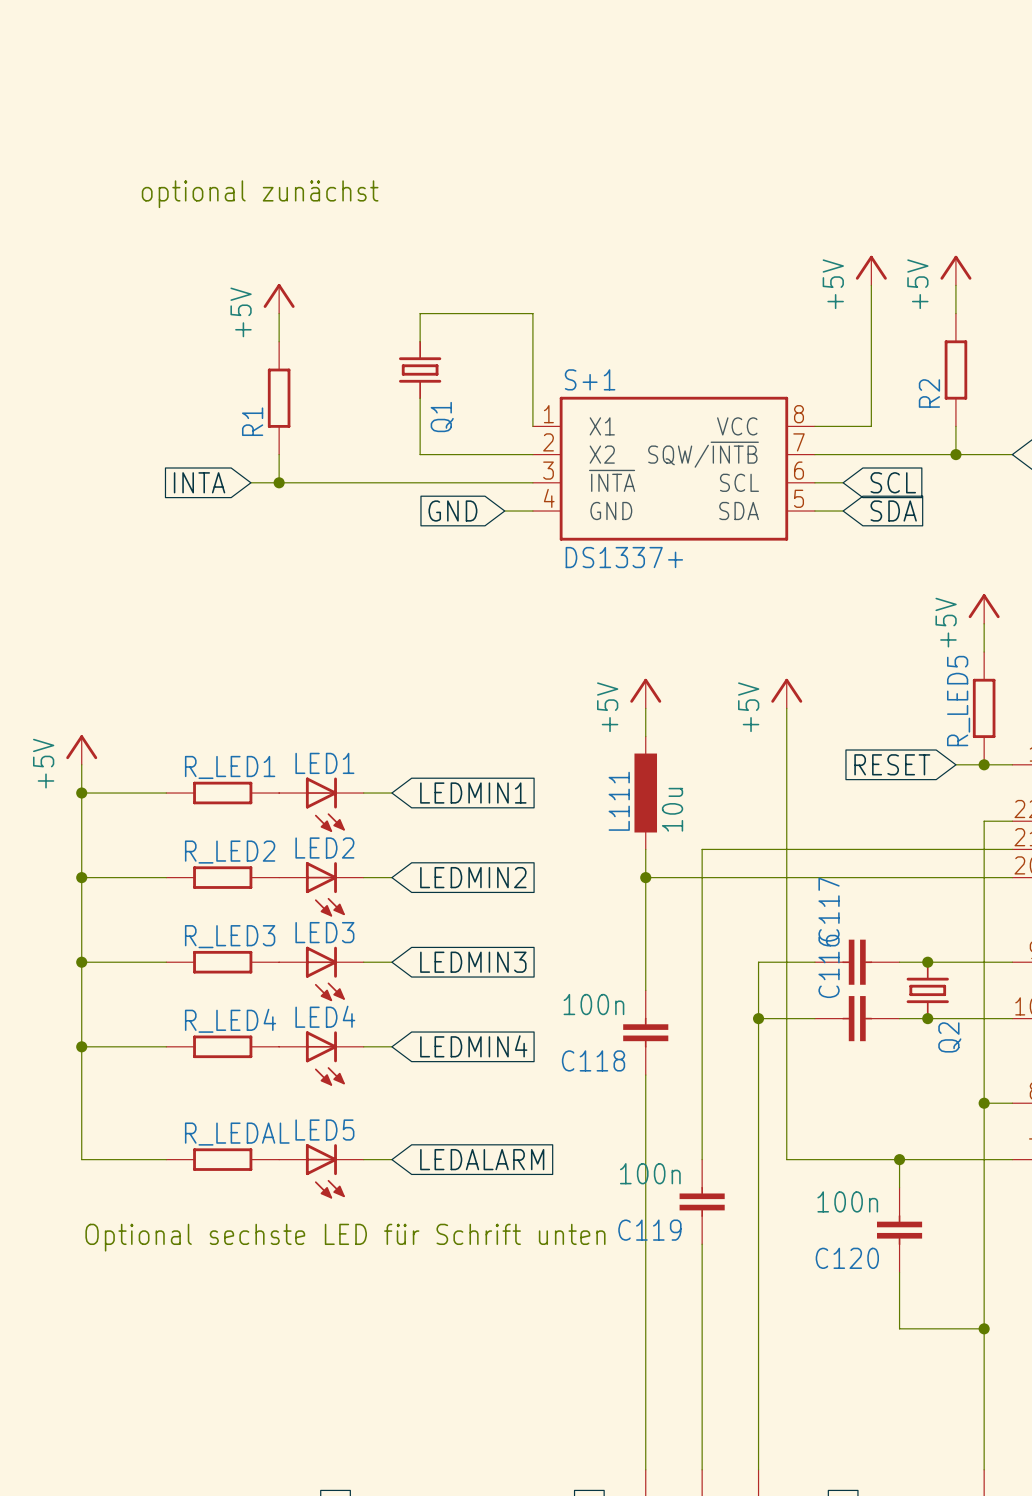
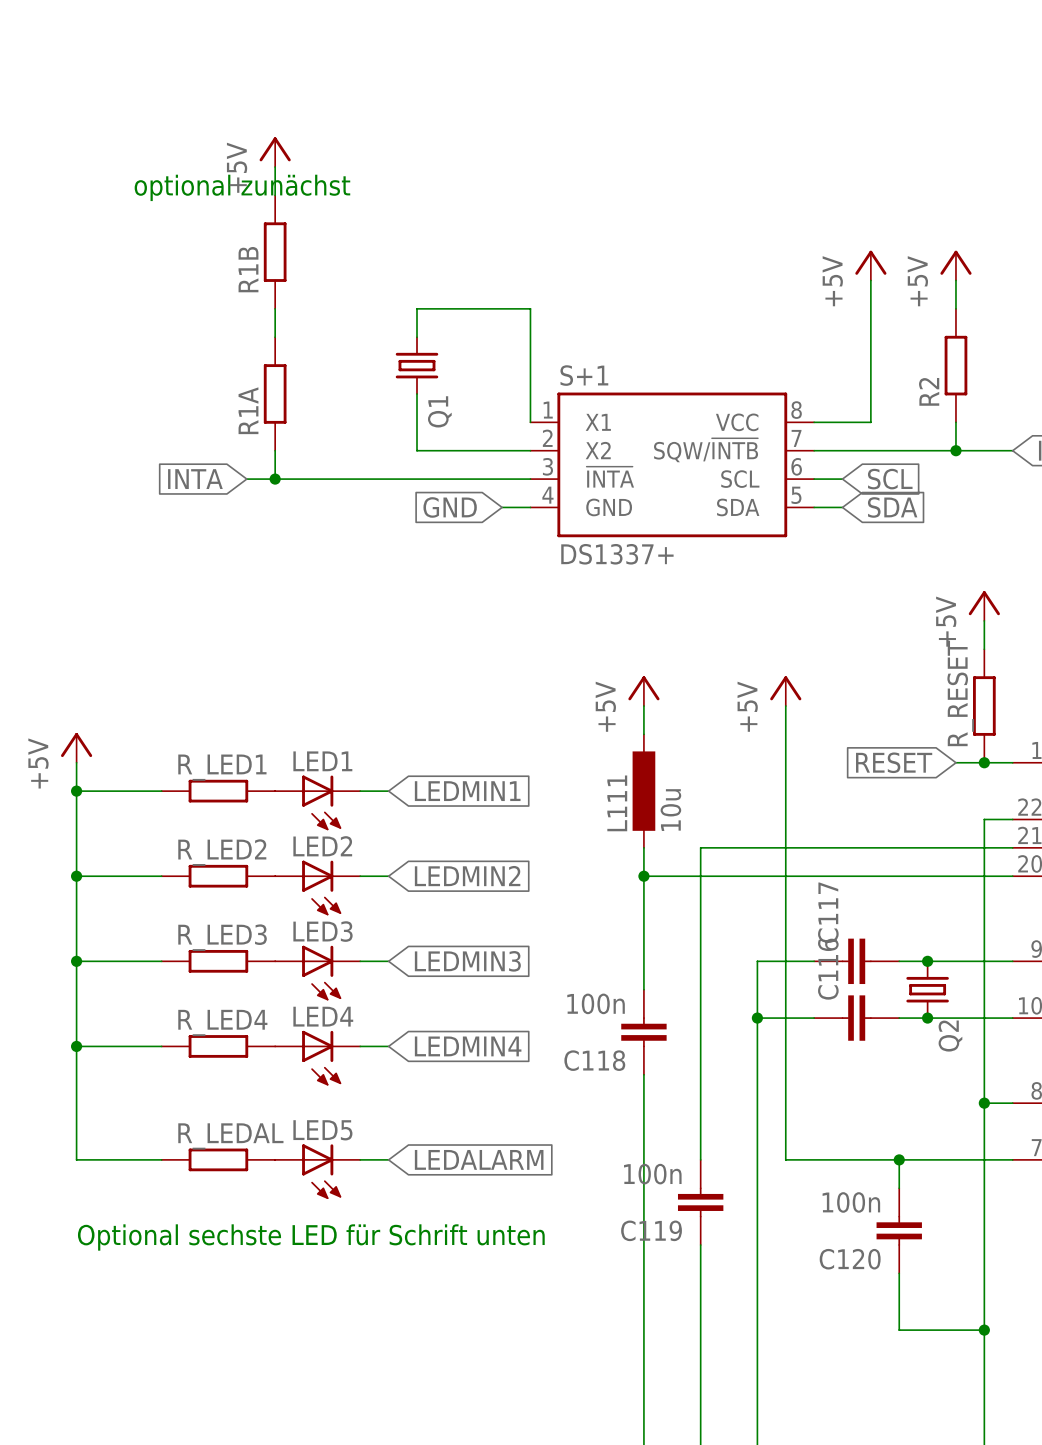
wire: none -> (275, 167) (275, 195)
R1B: none -> (275, 252)
power symbol position: +5V (279, 298) -> +5V (275, 152)
R1 name: R1 (252, 421) -> R1A (248, 410)
R_LED5 name: R_LED5 (958, 701) -> R_RESET (960, 693)

